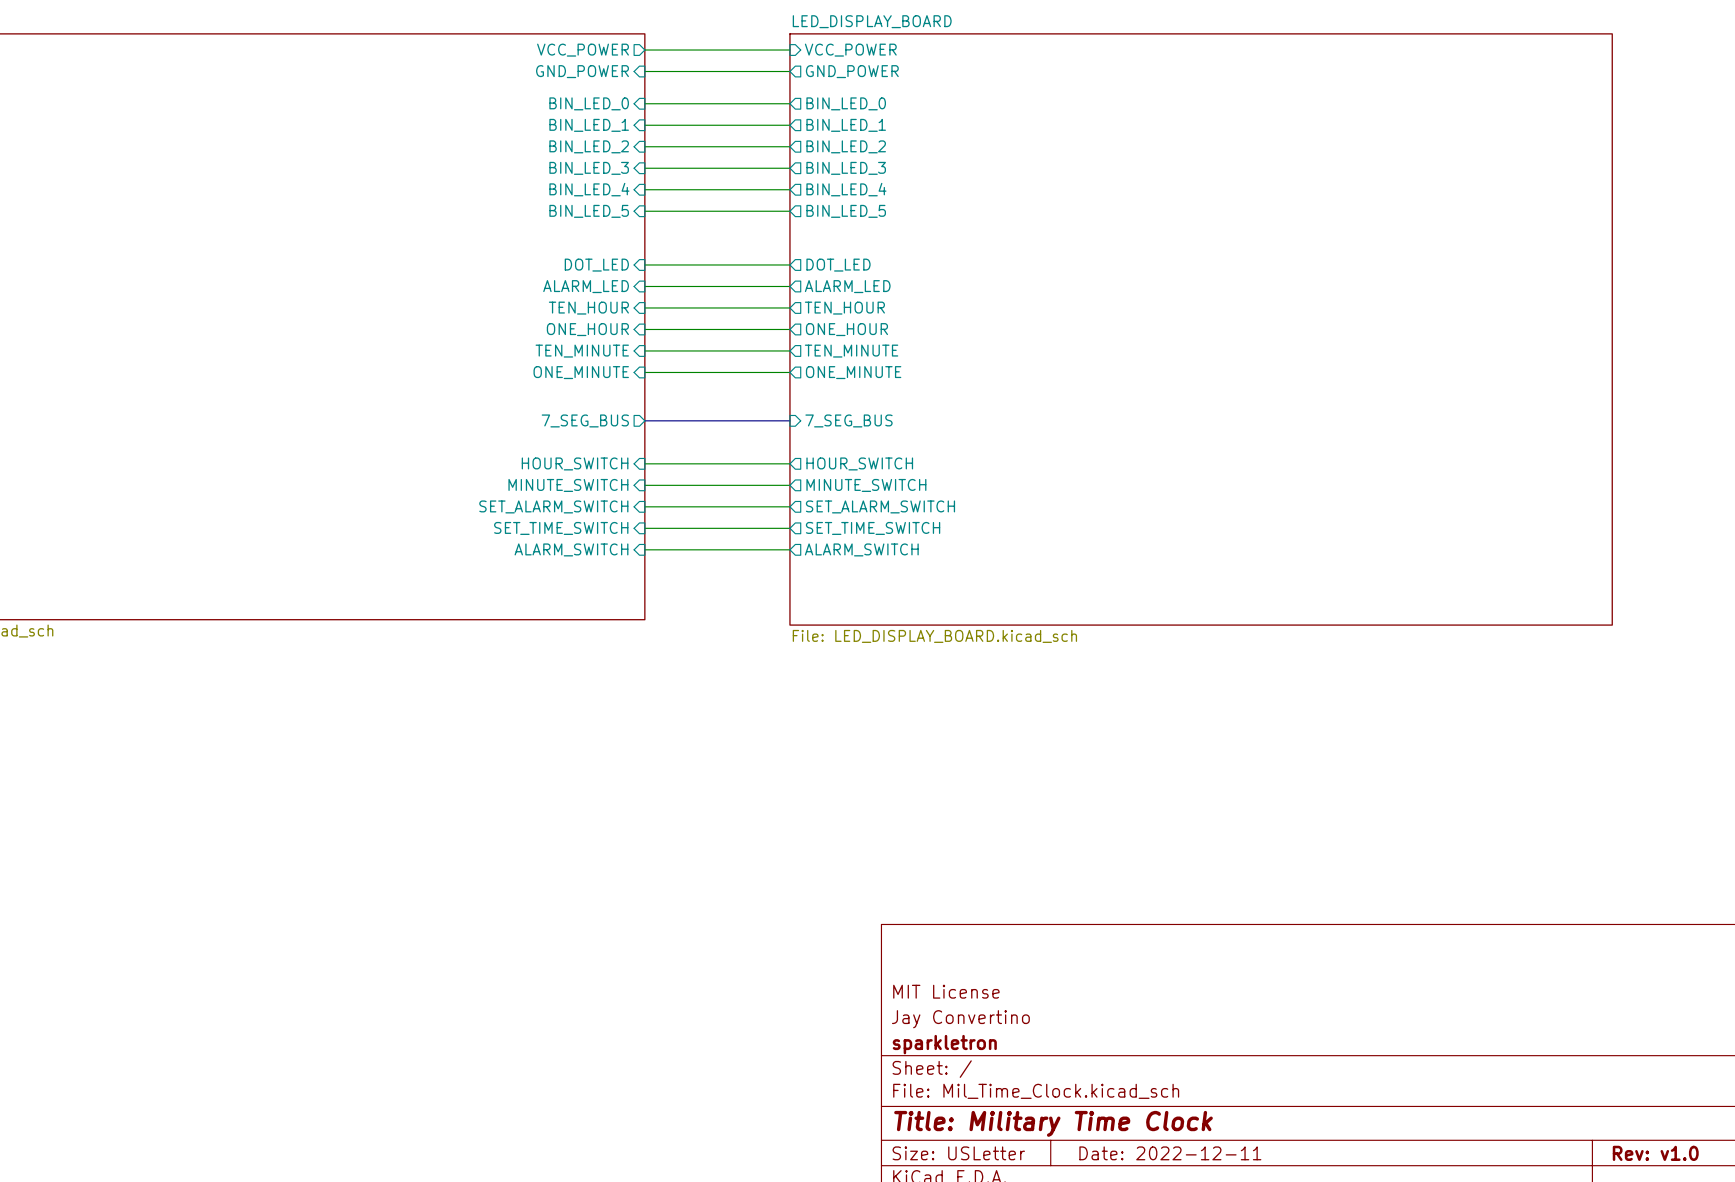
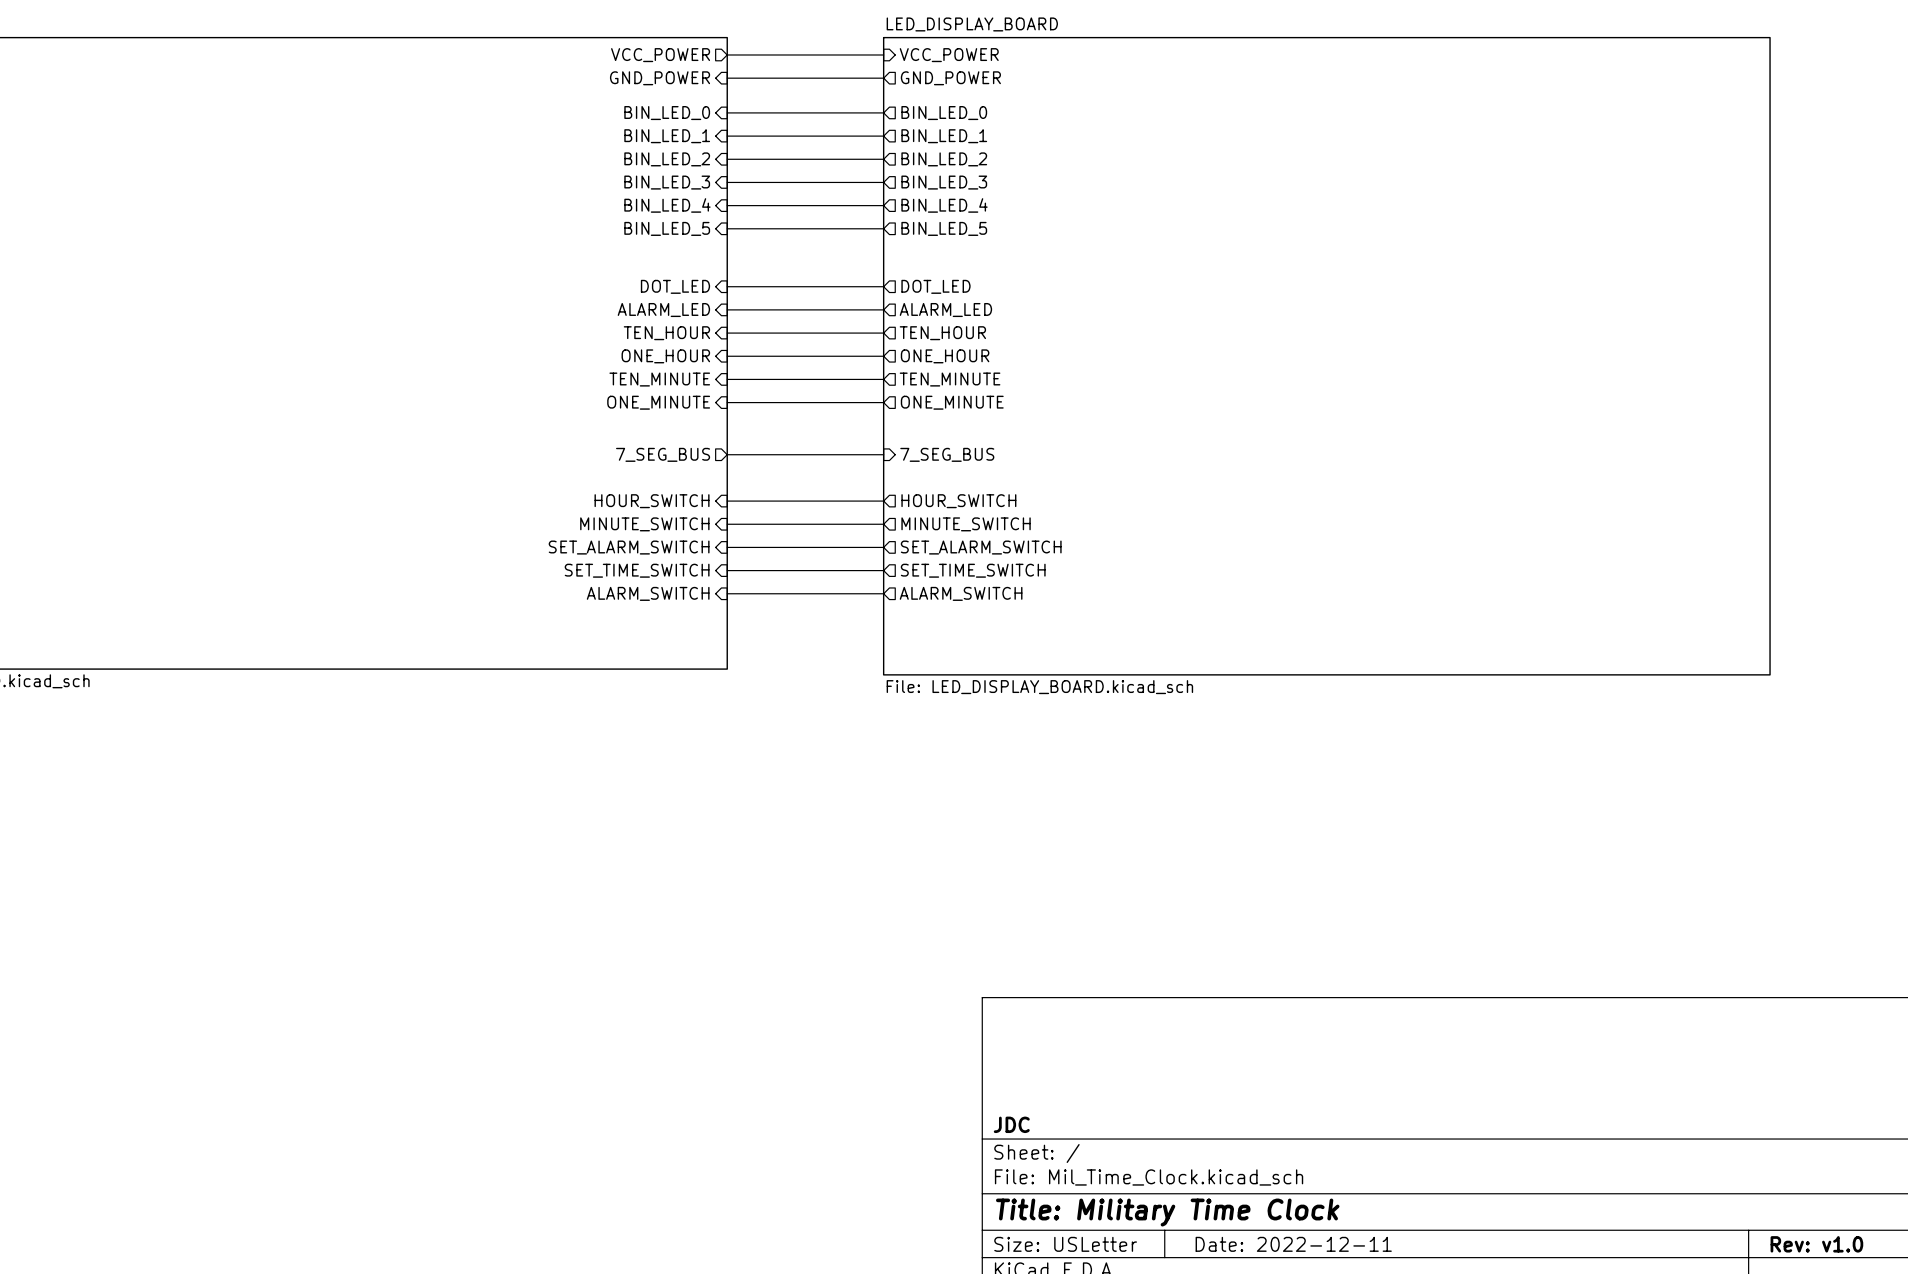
title block: MIT License (946, 991) -> none
title block: Jay Convertino (960, 1019) -> none
title block: sparkletron (944, 1044) -> JDC (1011, 1124)

